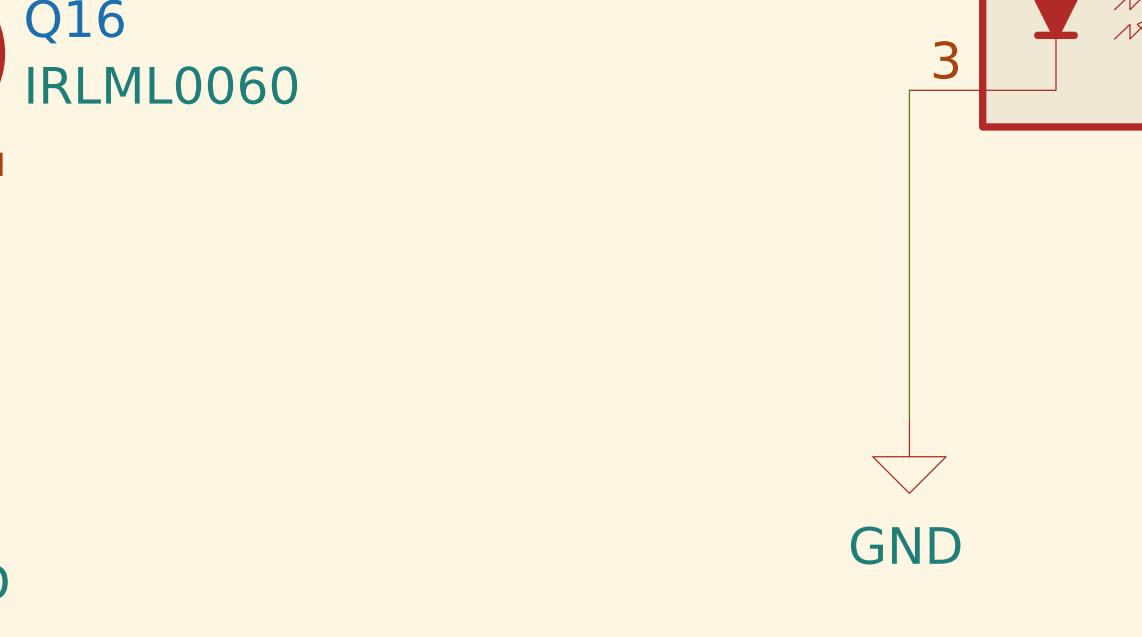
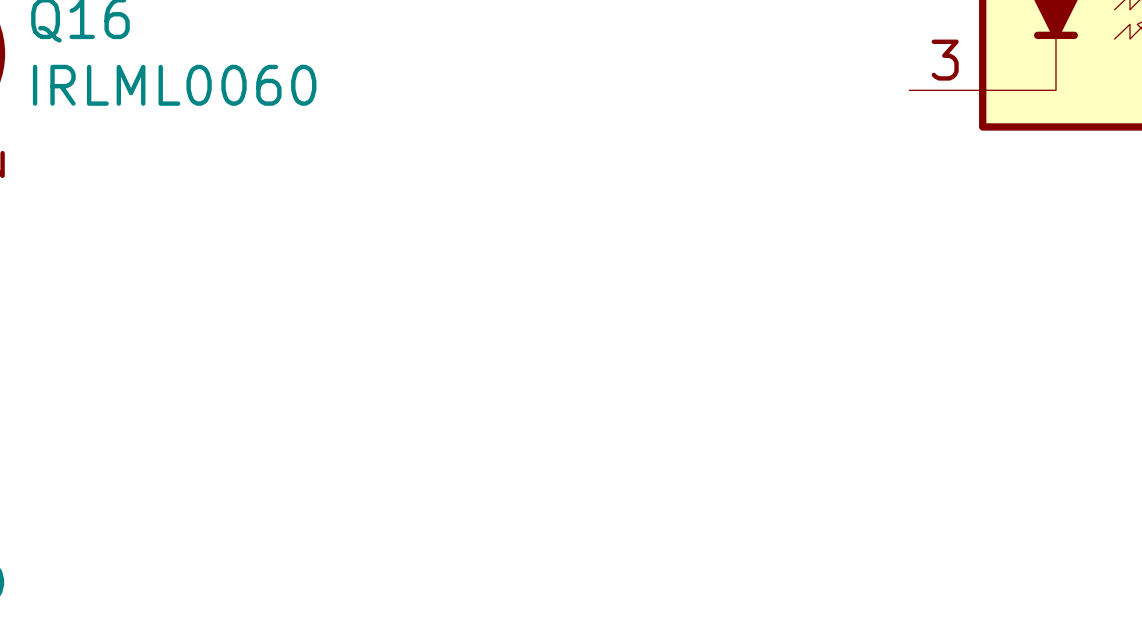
wire: (909, 90) (909, 420) -> none
power symbol: GND (909, 456) -> none

